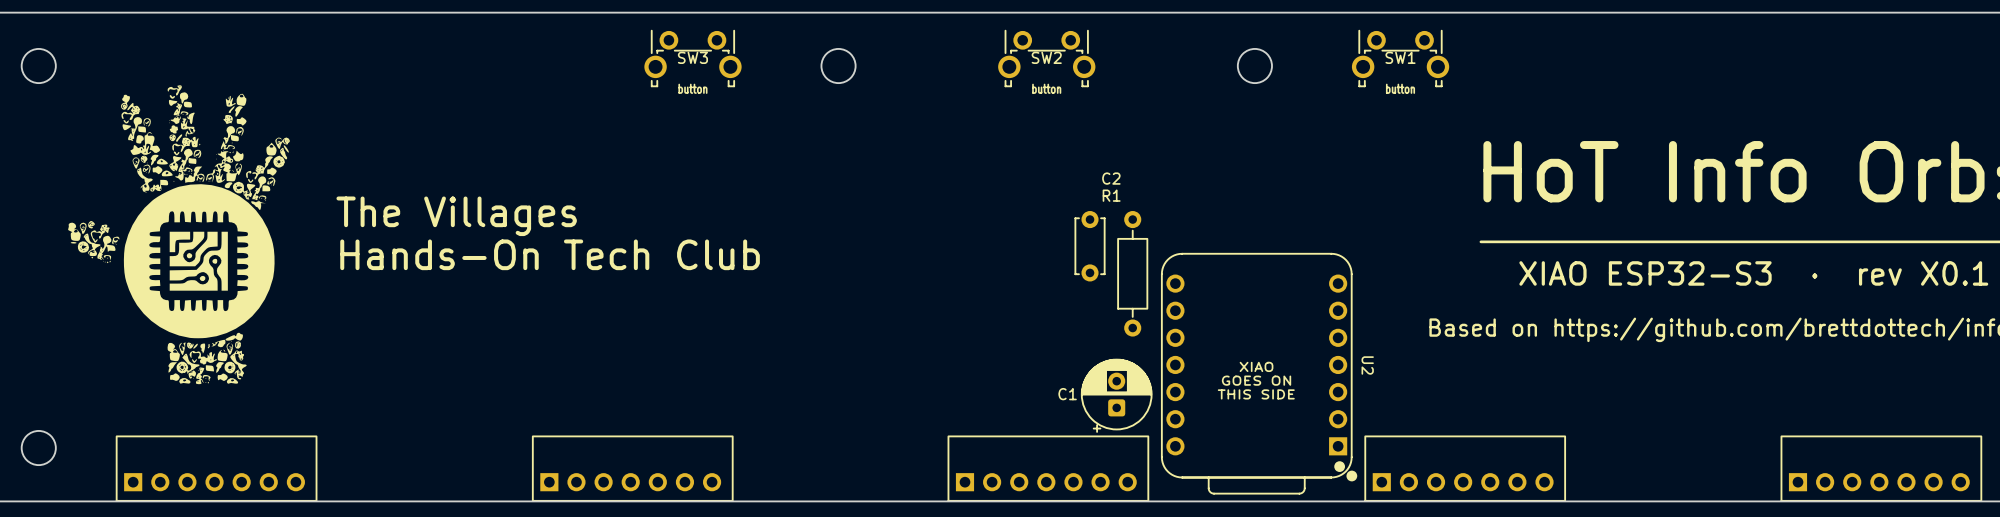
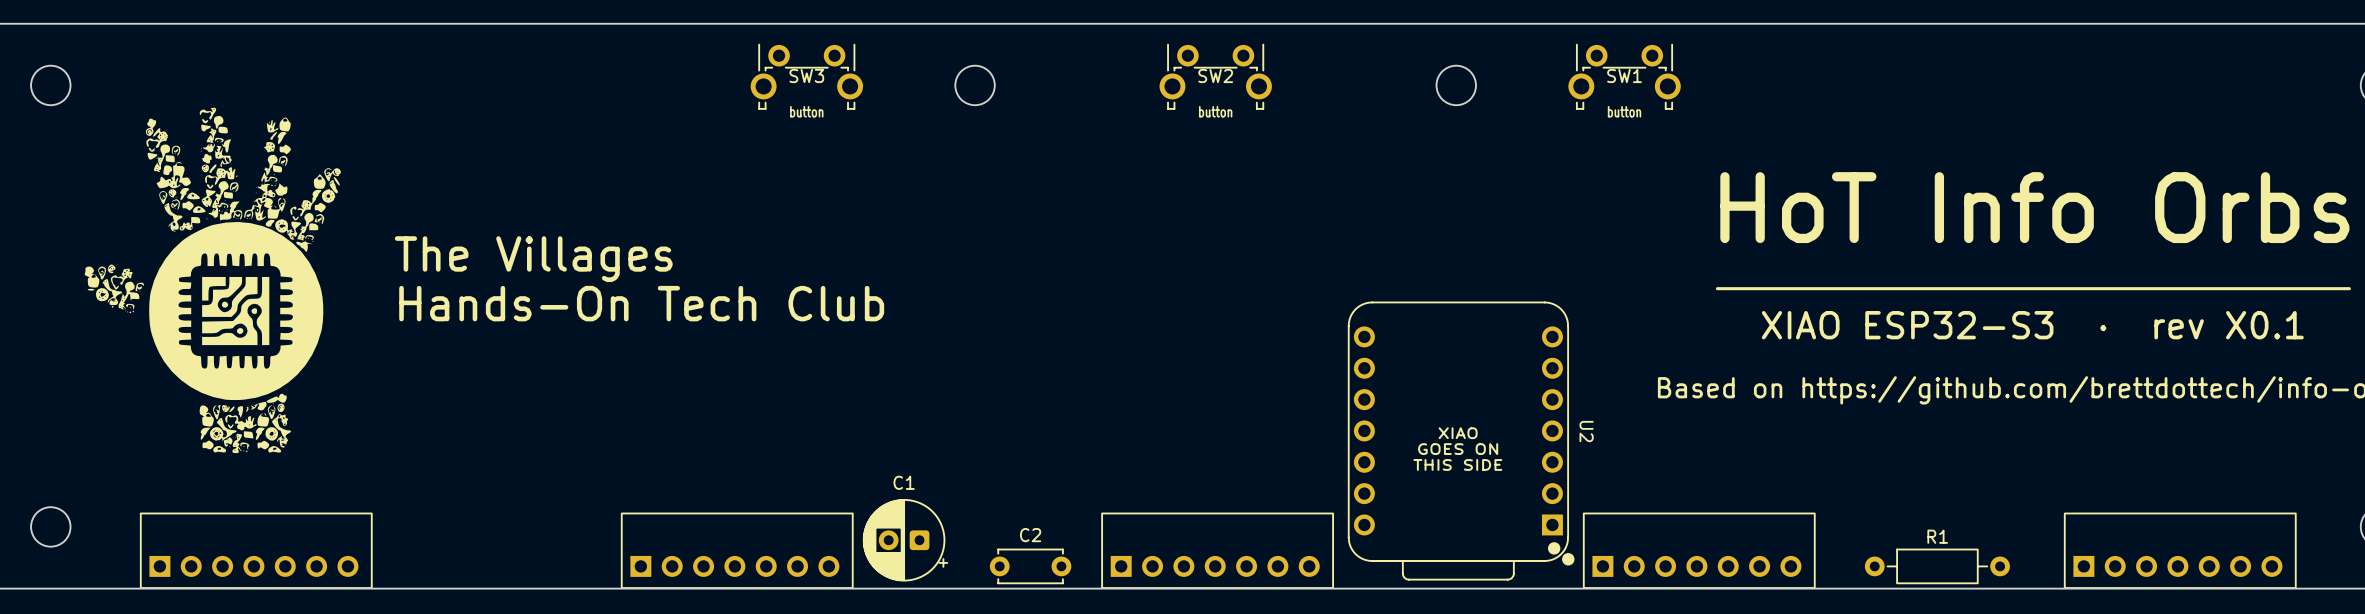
C2 name position: C2 (1111, 178) -> C2 (1030, 535)
R1 name position: R1 (1111, 195) -> R1 (1937, 536)
C2 rotation: 0° (1090, 246) -> 90° clockwise (1030, 566)
C2 position: (1090, 246) -> (1030, 566)
R1 rotation: 0° (1132, 273) -> 90° clockwise (1937, 566)
R1 position: (1132, 273) -> (1937, 566)
C1 name position: C1 (1067, 394) -> C1 (904, 482)
C1 rotation: 0° (1116, 395) -> 90° counterclockwise (905, 540)
C1 position: (1116, 395) -> (905, 540)

